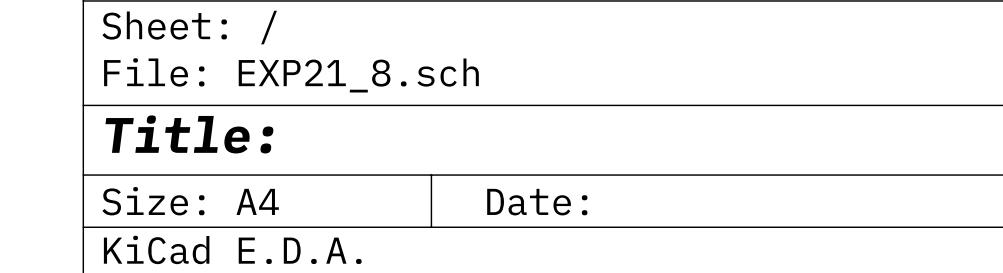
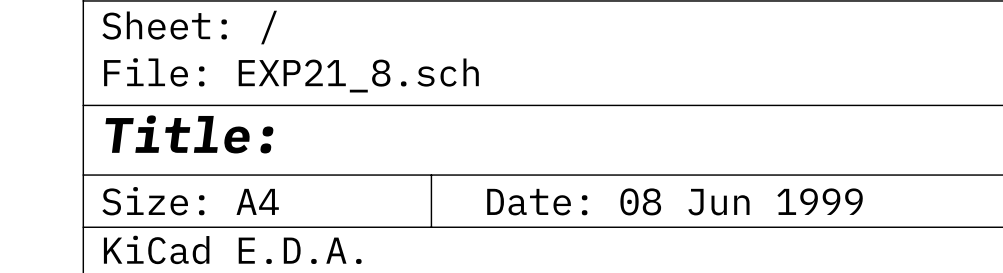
title block: Date: (537, 202) -> Date: 08 Jun 1999 (674, 201)

